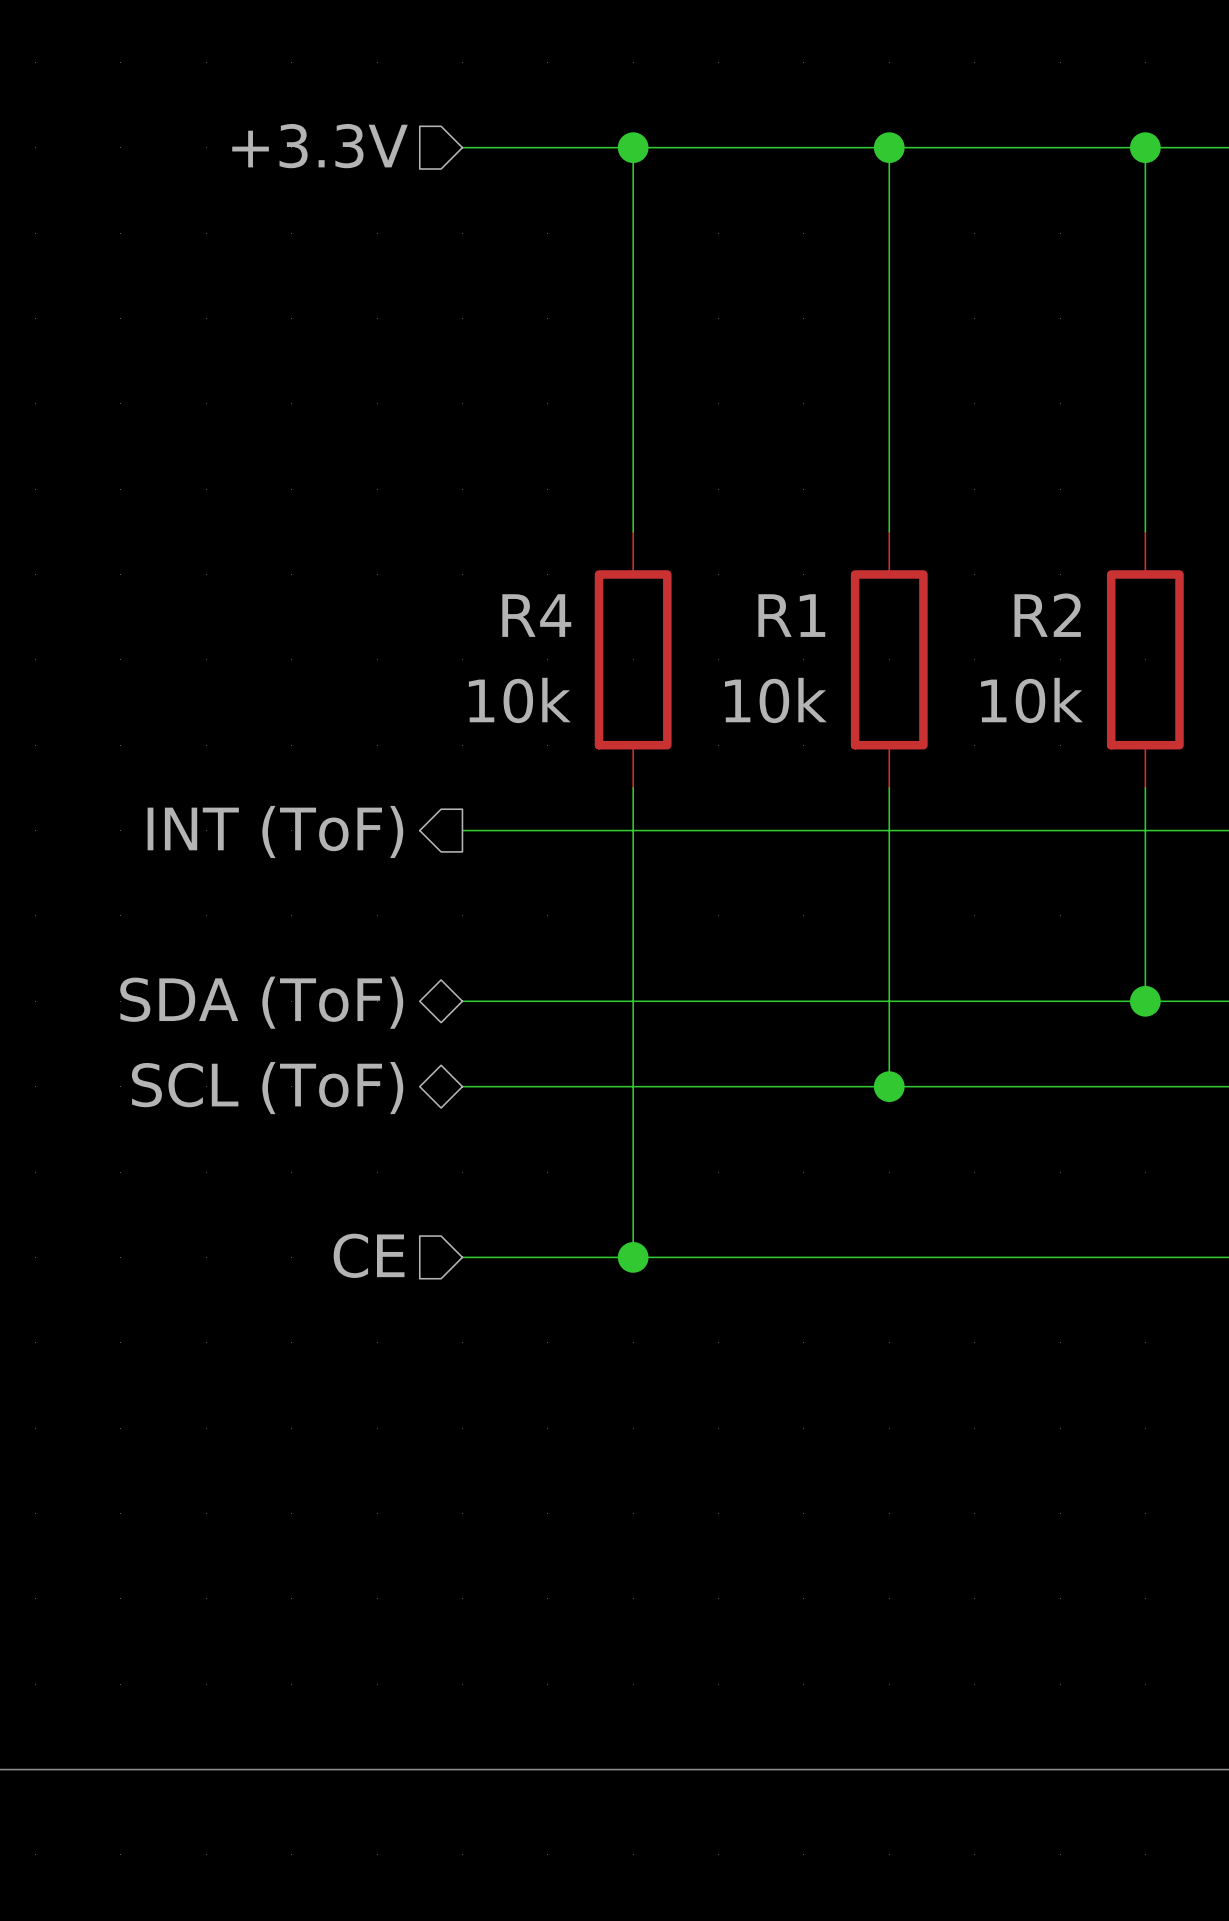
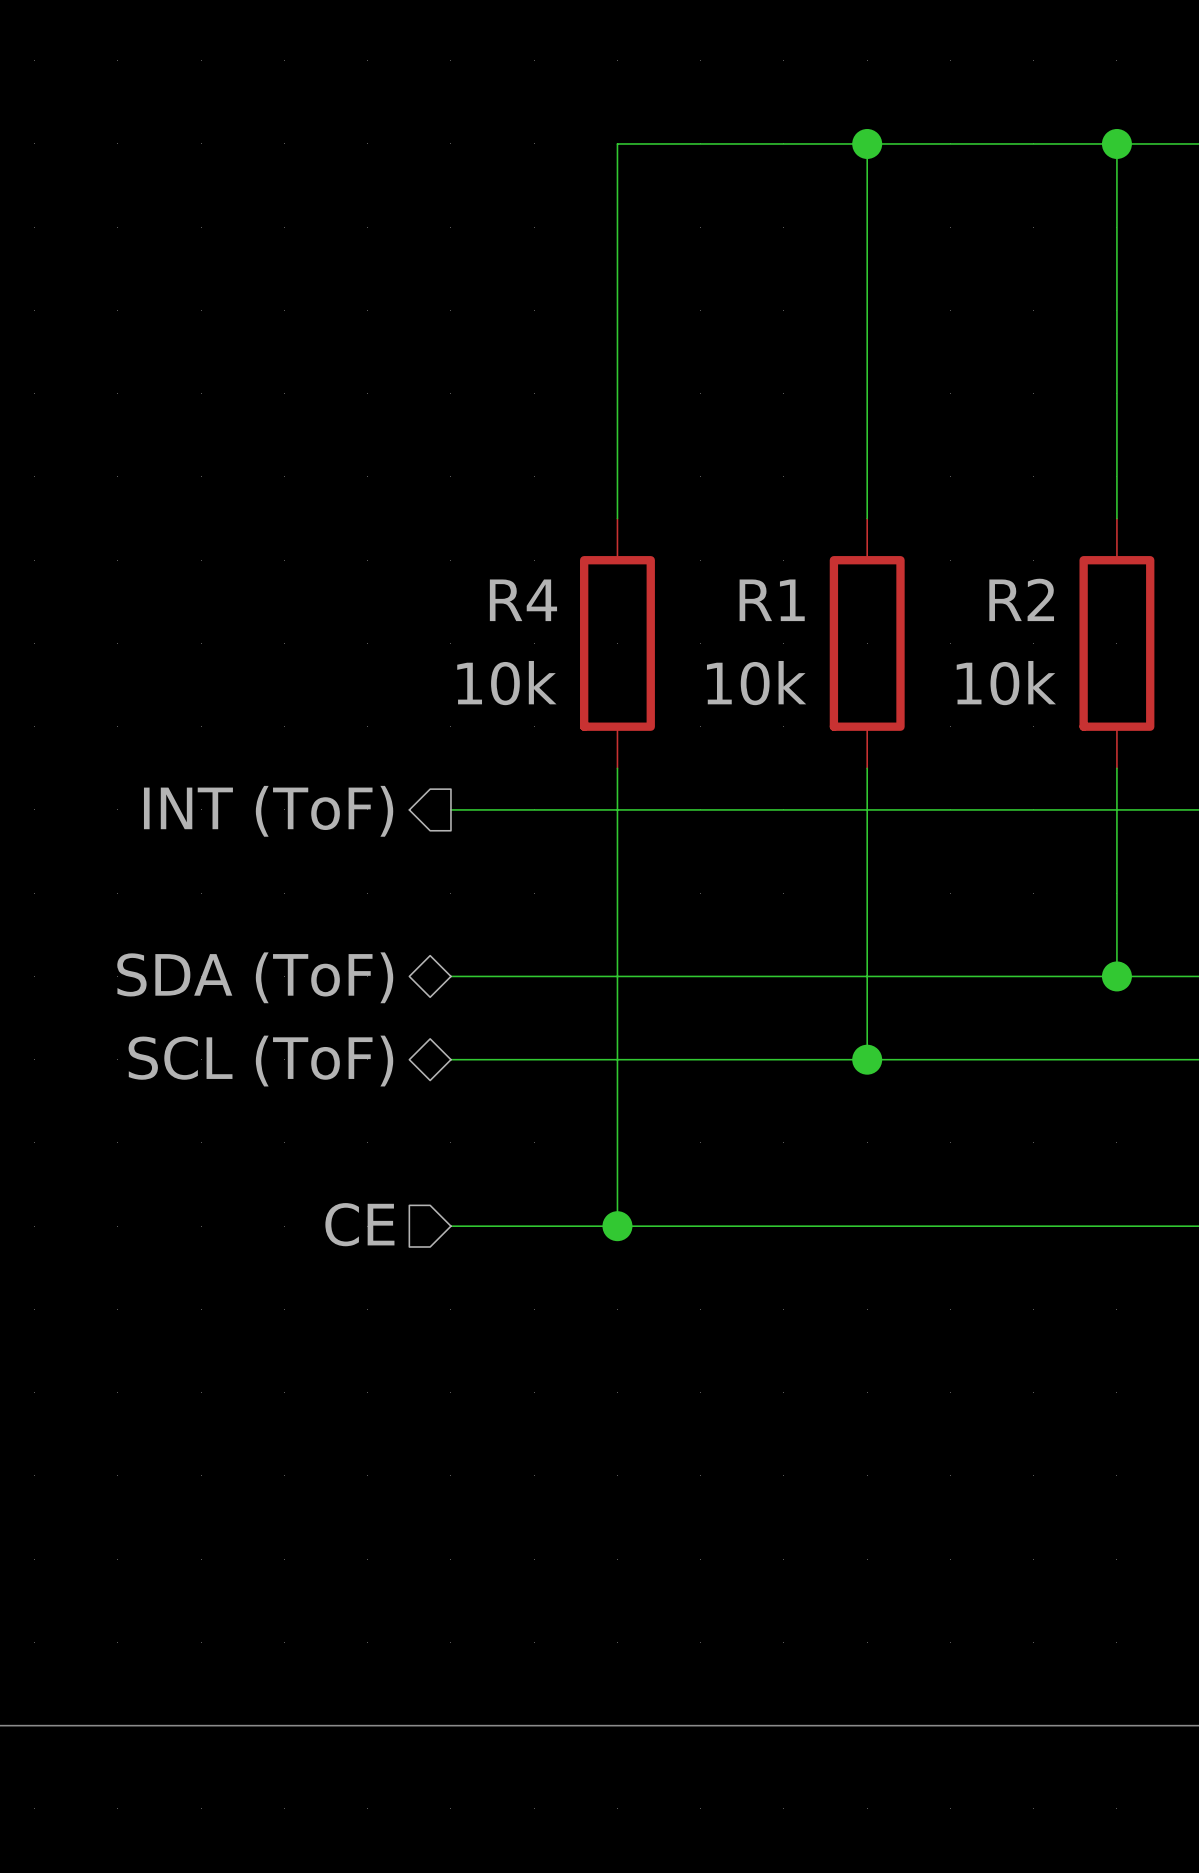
hierarchical label: +3.3V (319, 146) -> none
wire: (462, 147) (633, 147) -> none
junction: (633, 147) -> none

